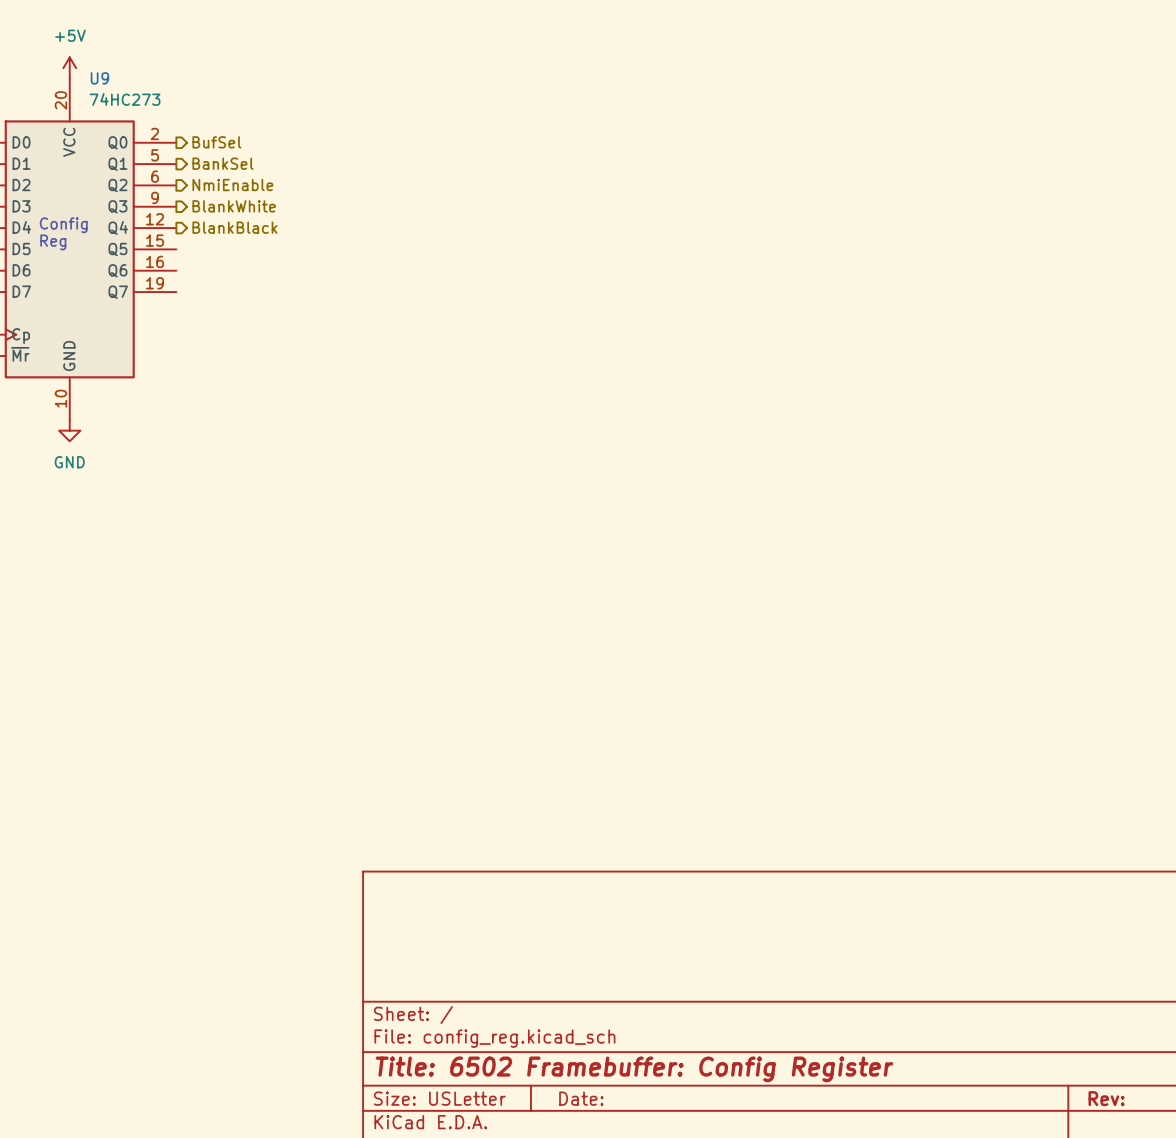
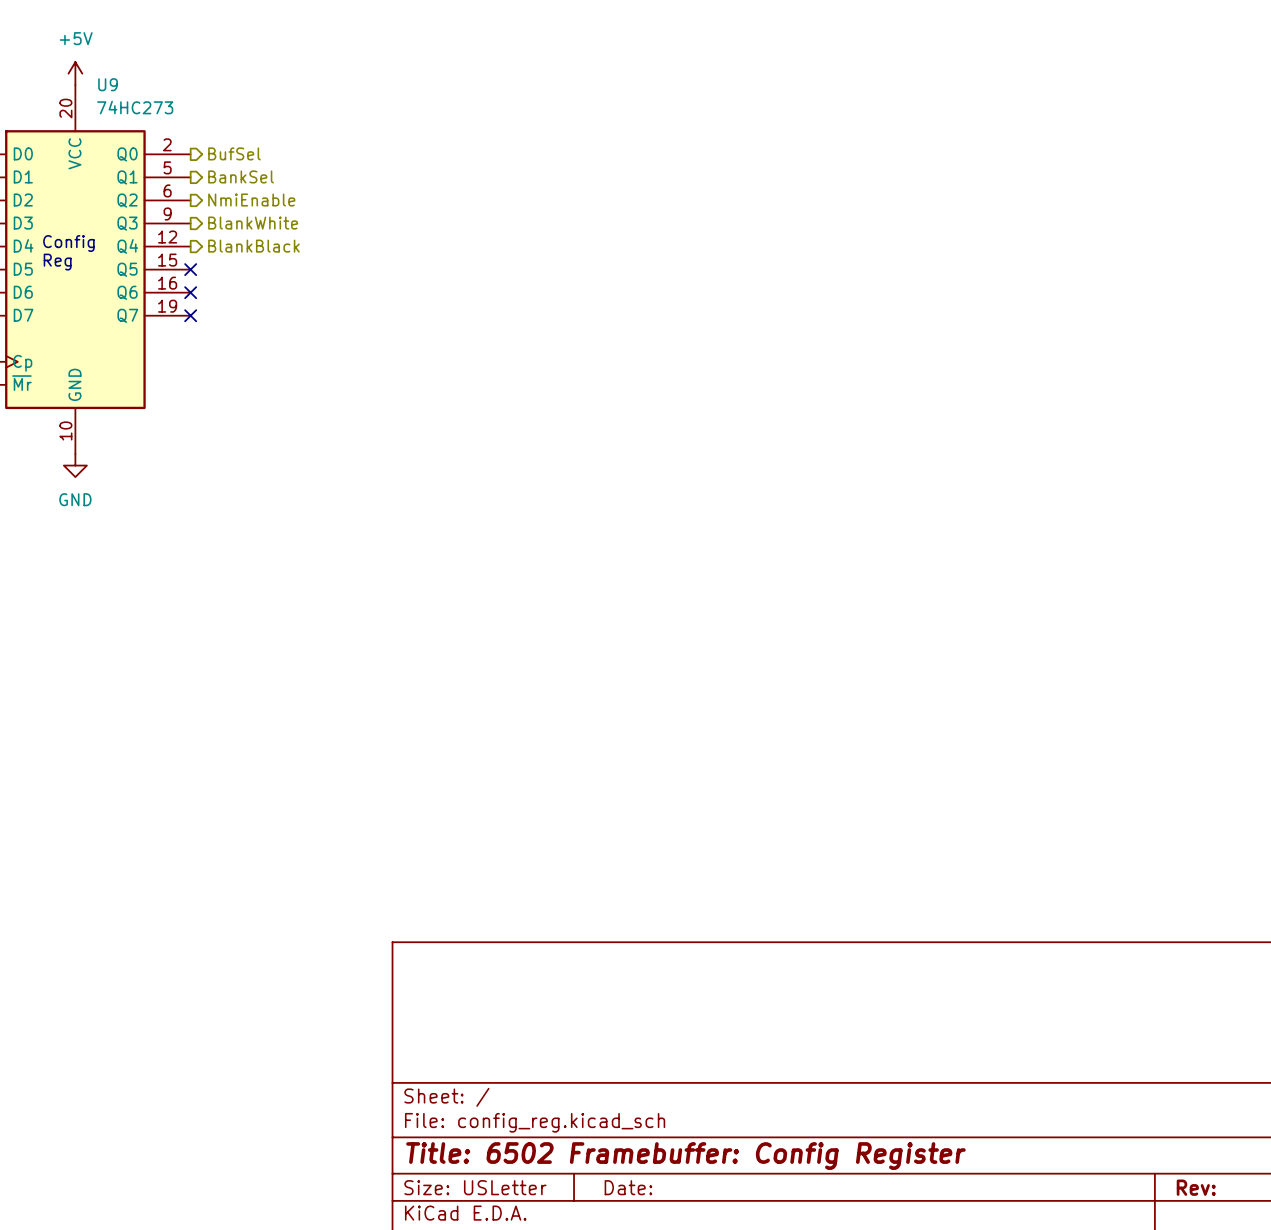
no-connect mark: none -> (190, 269)
no-connect mark: none -> (190, 292)
no-connect mark: none -> (190, 315)

